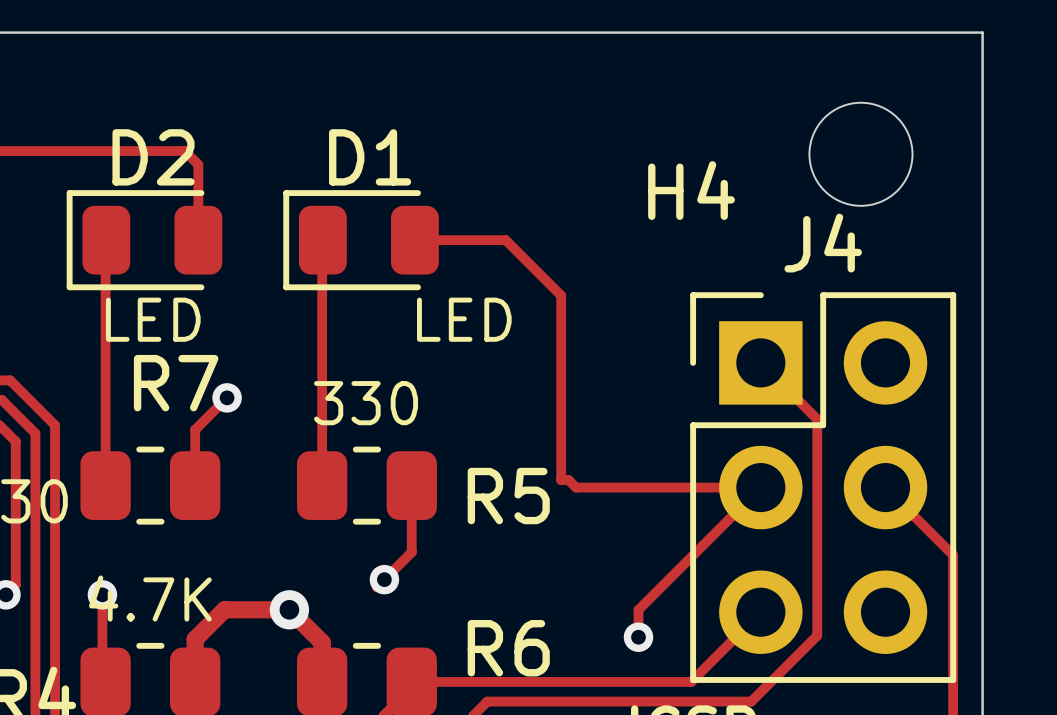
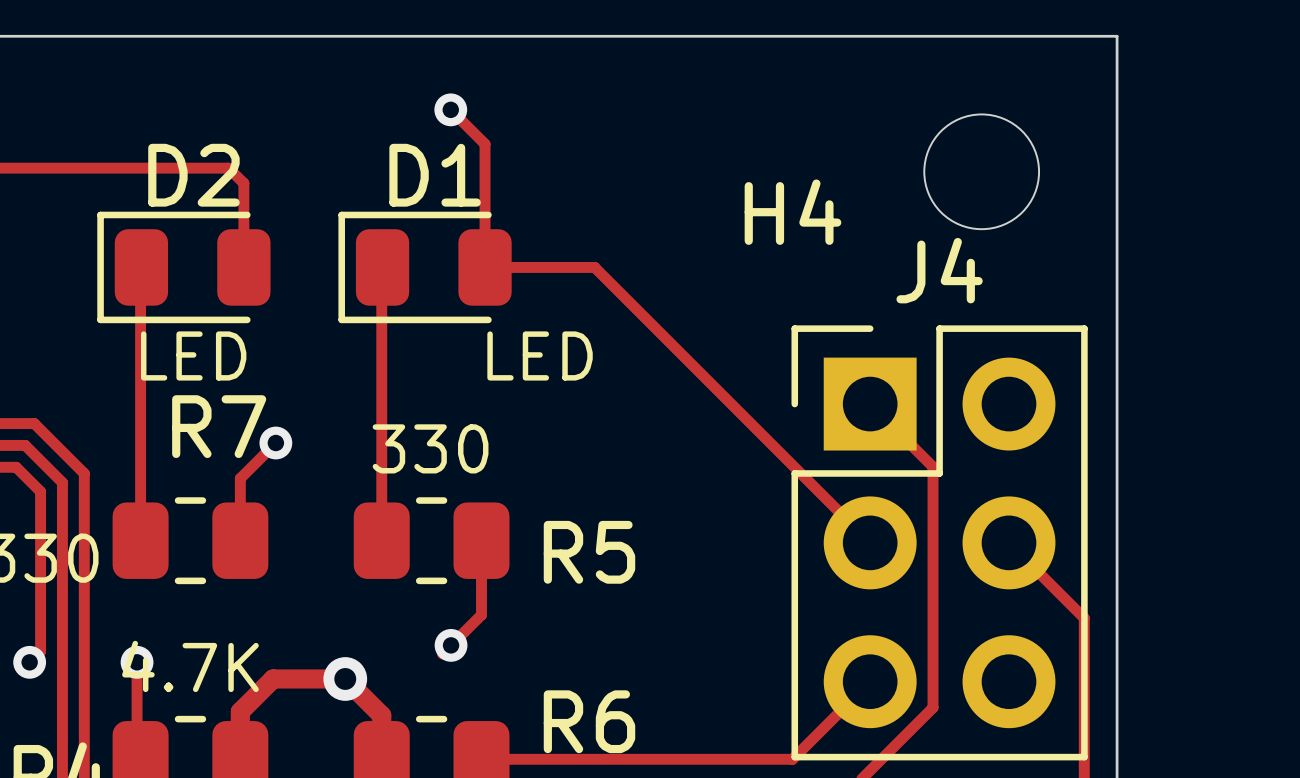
track: none -> (450, 109) (485, 144) (485, 267)
via: none -> (450, 109)
track: (505, 240) (561, 295) (561, 480) (568, 480) (576, 487) (760, 487) (638, 609) (638, 637) -> (586, 267) (594, 267) (870, 542)
via: (638, 637) -> none

